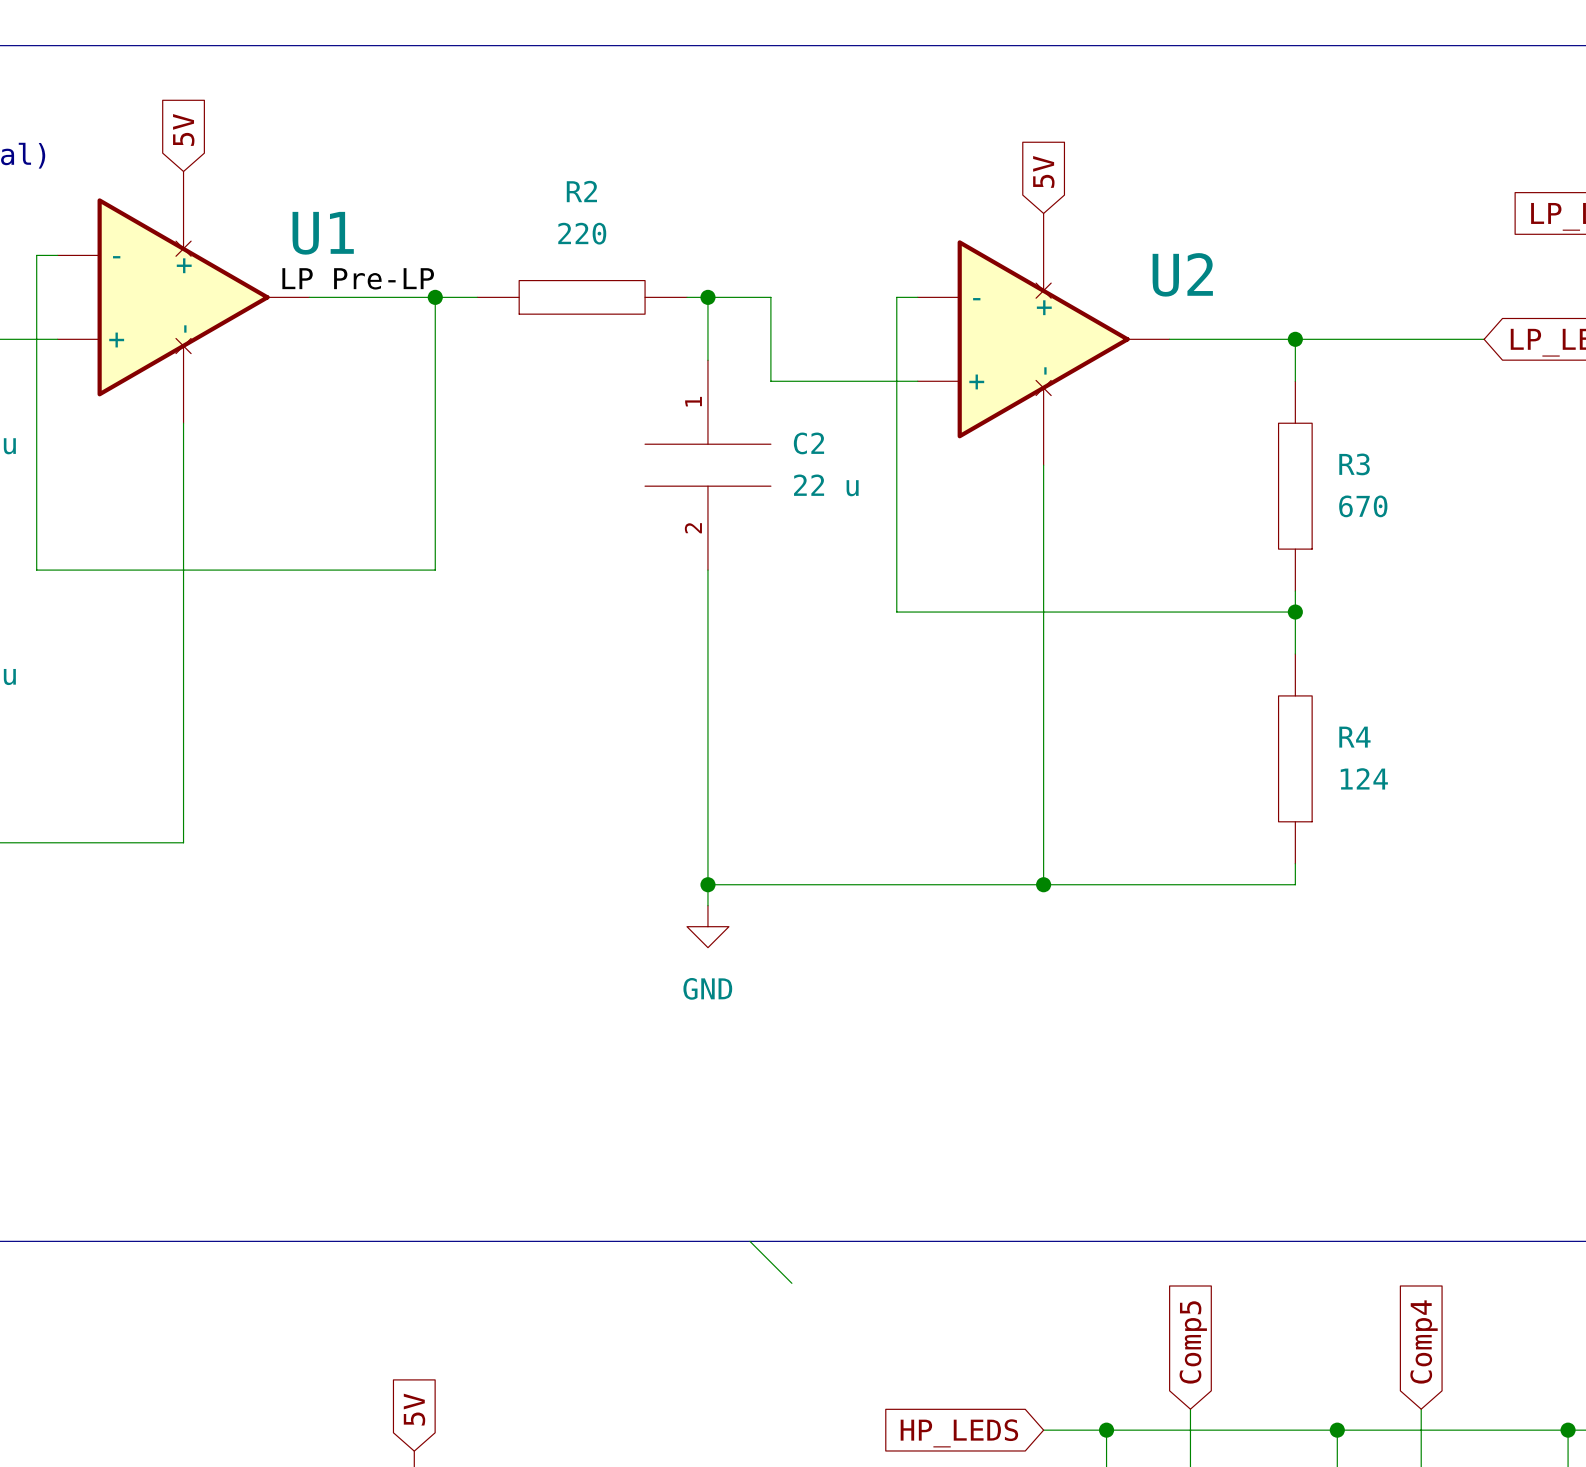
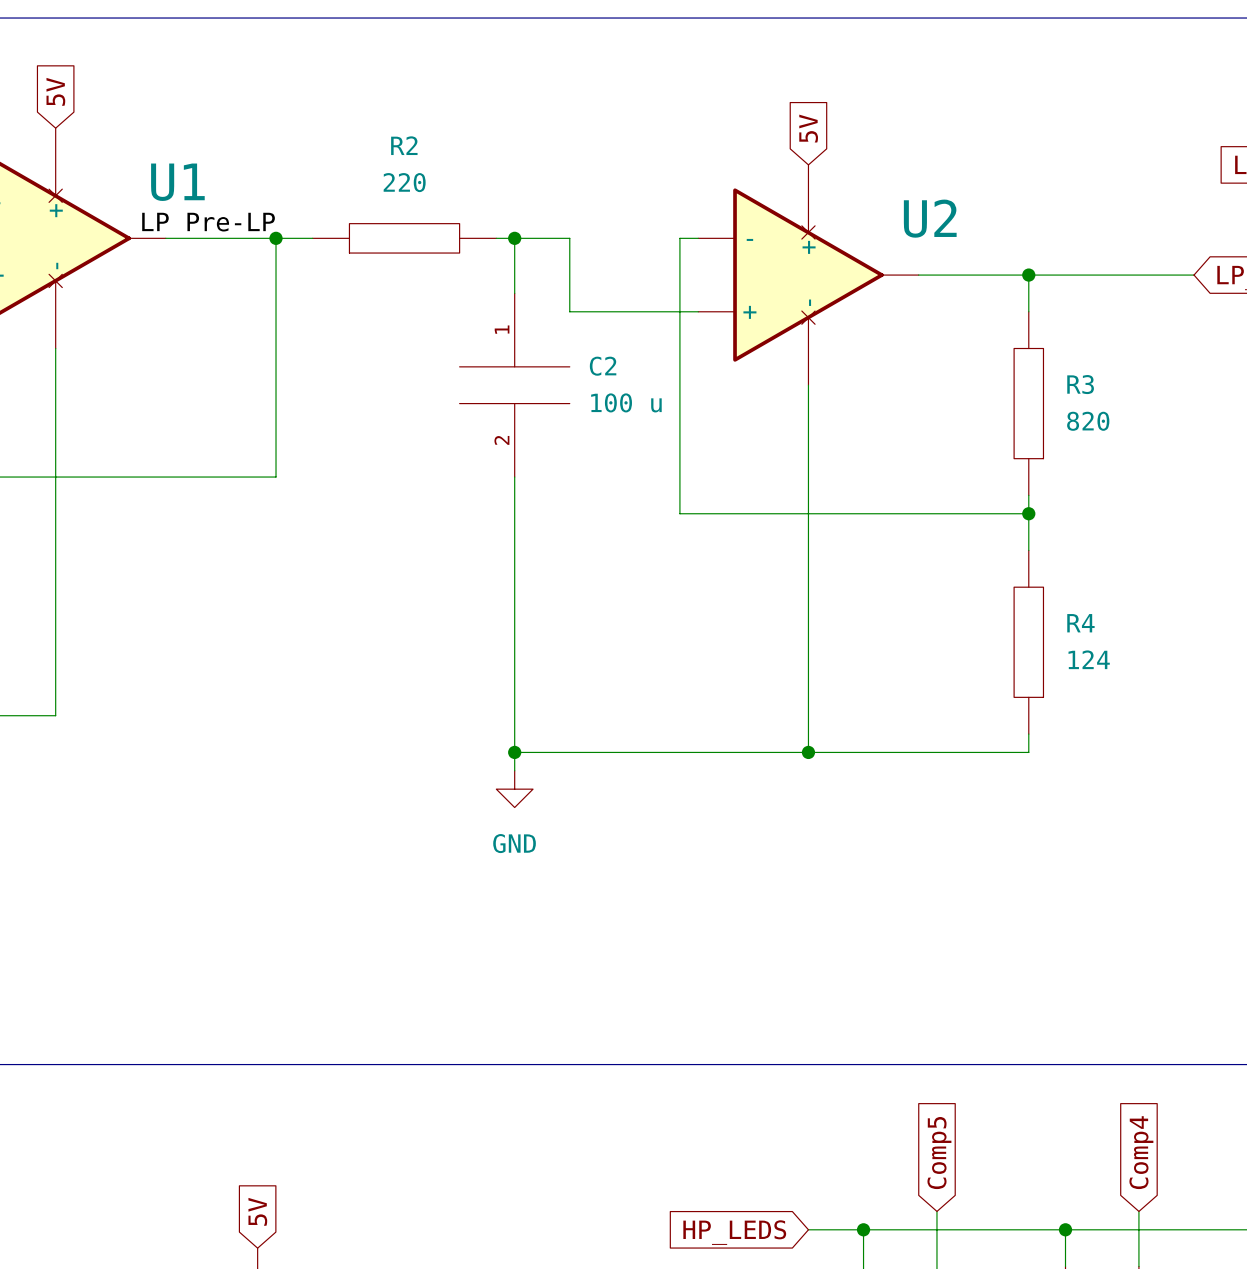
C2 value: 22 u (826, 485) -> 100 u (626, 402)
R3 value: 670 (1363, 506) -> 820 (1088, 421)
wire: (749, 1241) (791, 1283) -> none

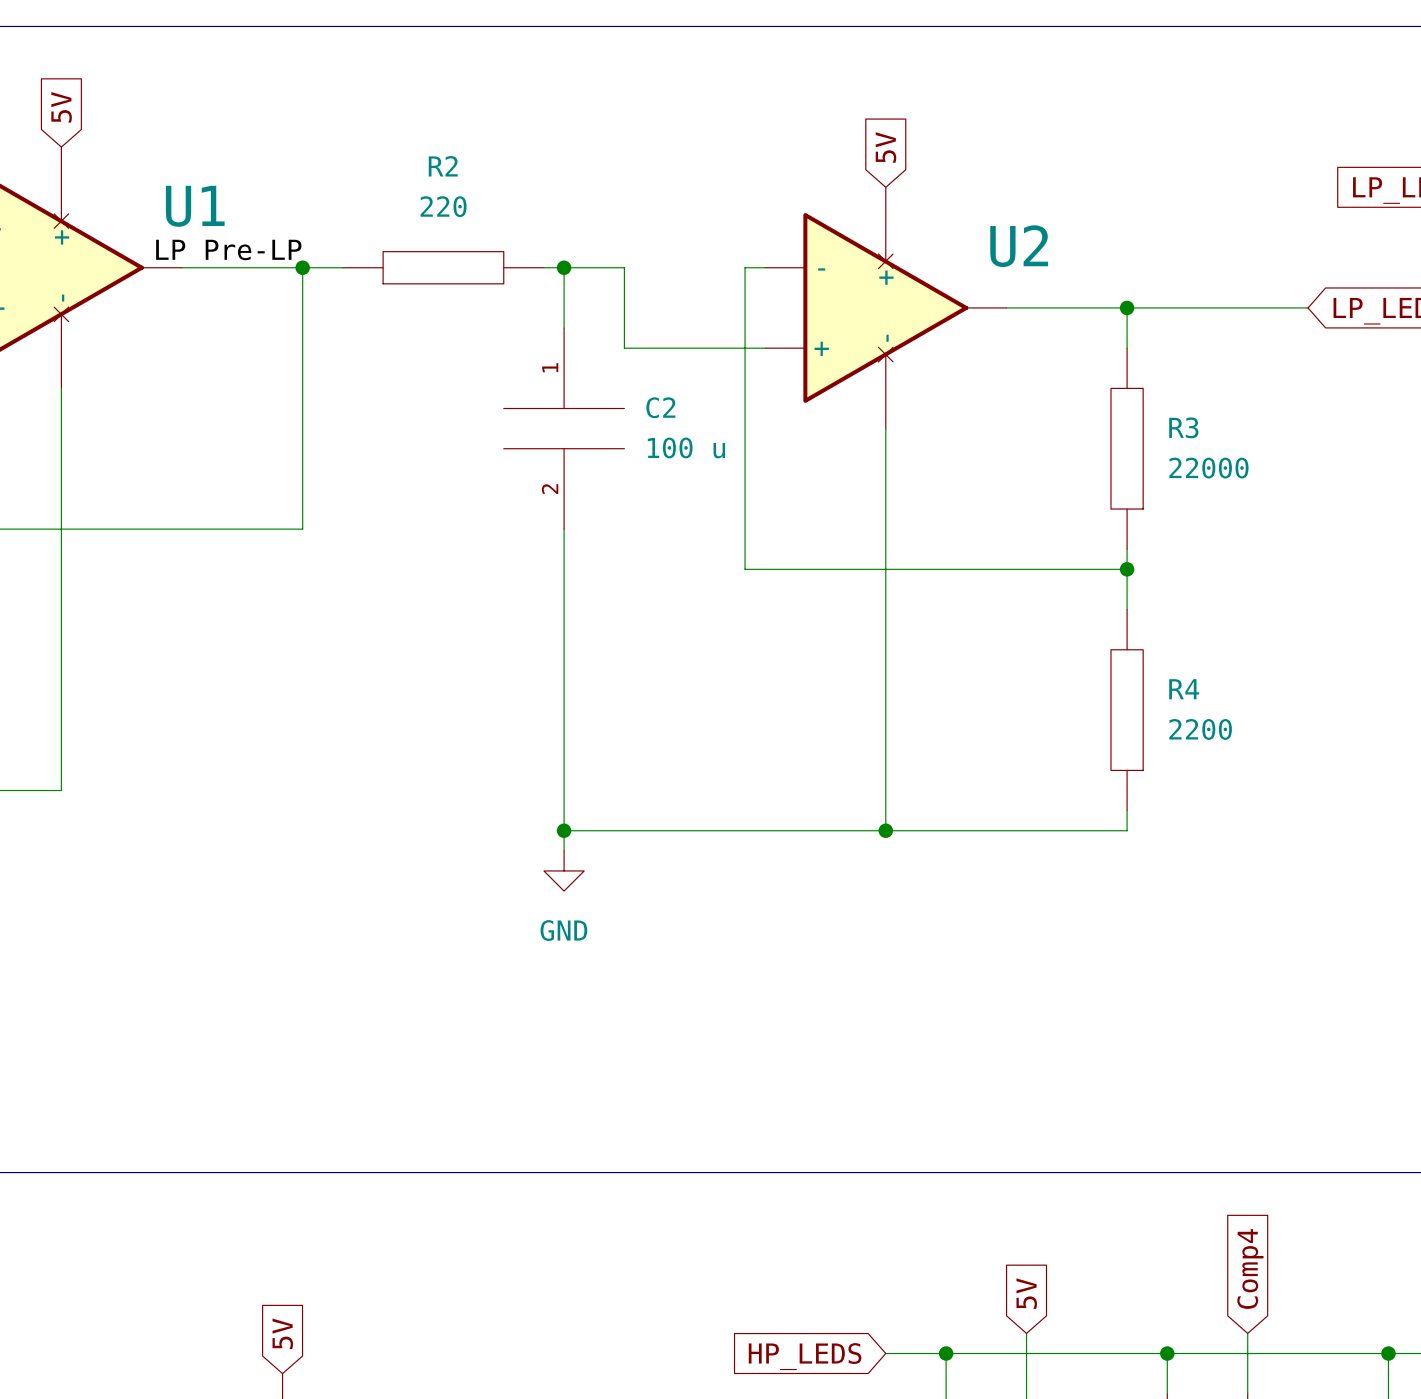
R3 value: 820 (1088, 421) -> 22000 (1208, 468)
R4 value: 124 (1089, 659) -> 2200 (1200, 729)
global label: Comp5 (939, 1153) -> 5V (1026, 1293)

